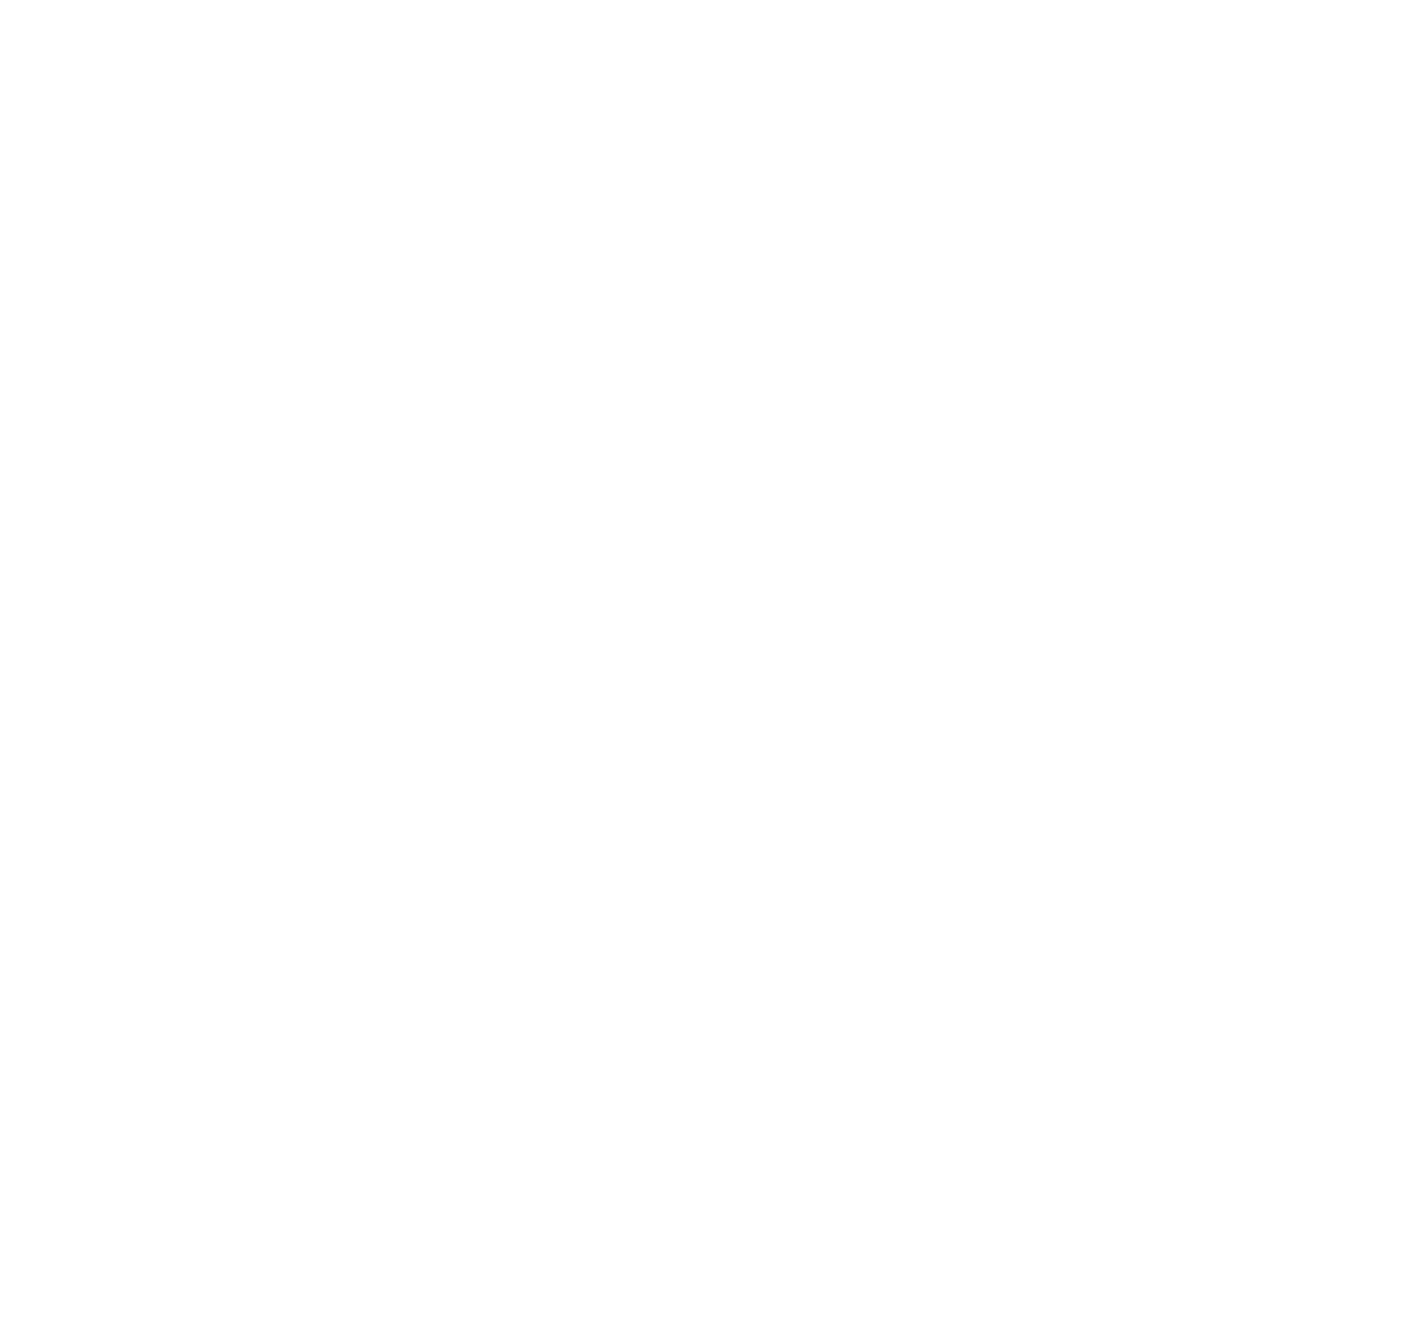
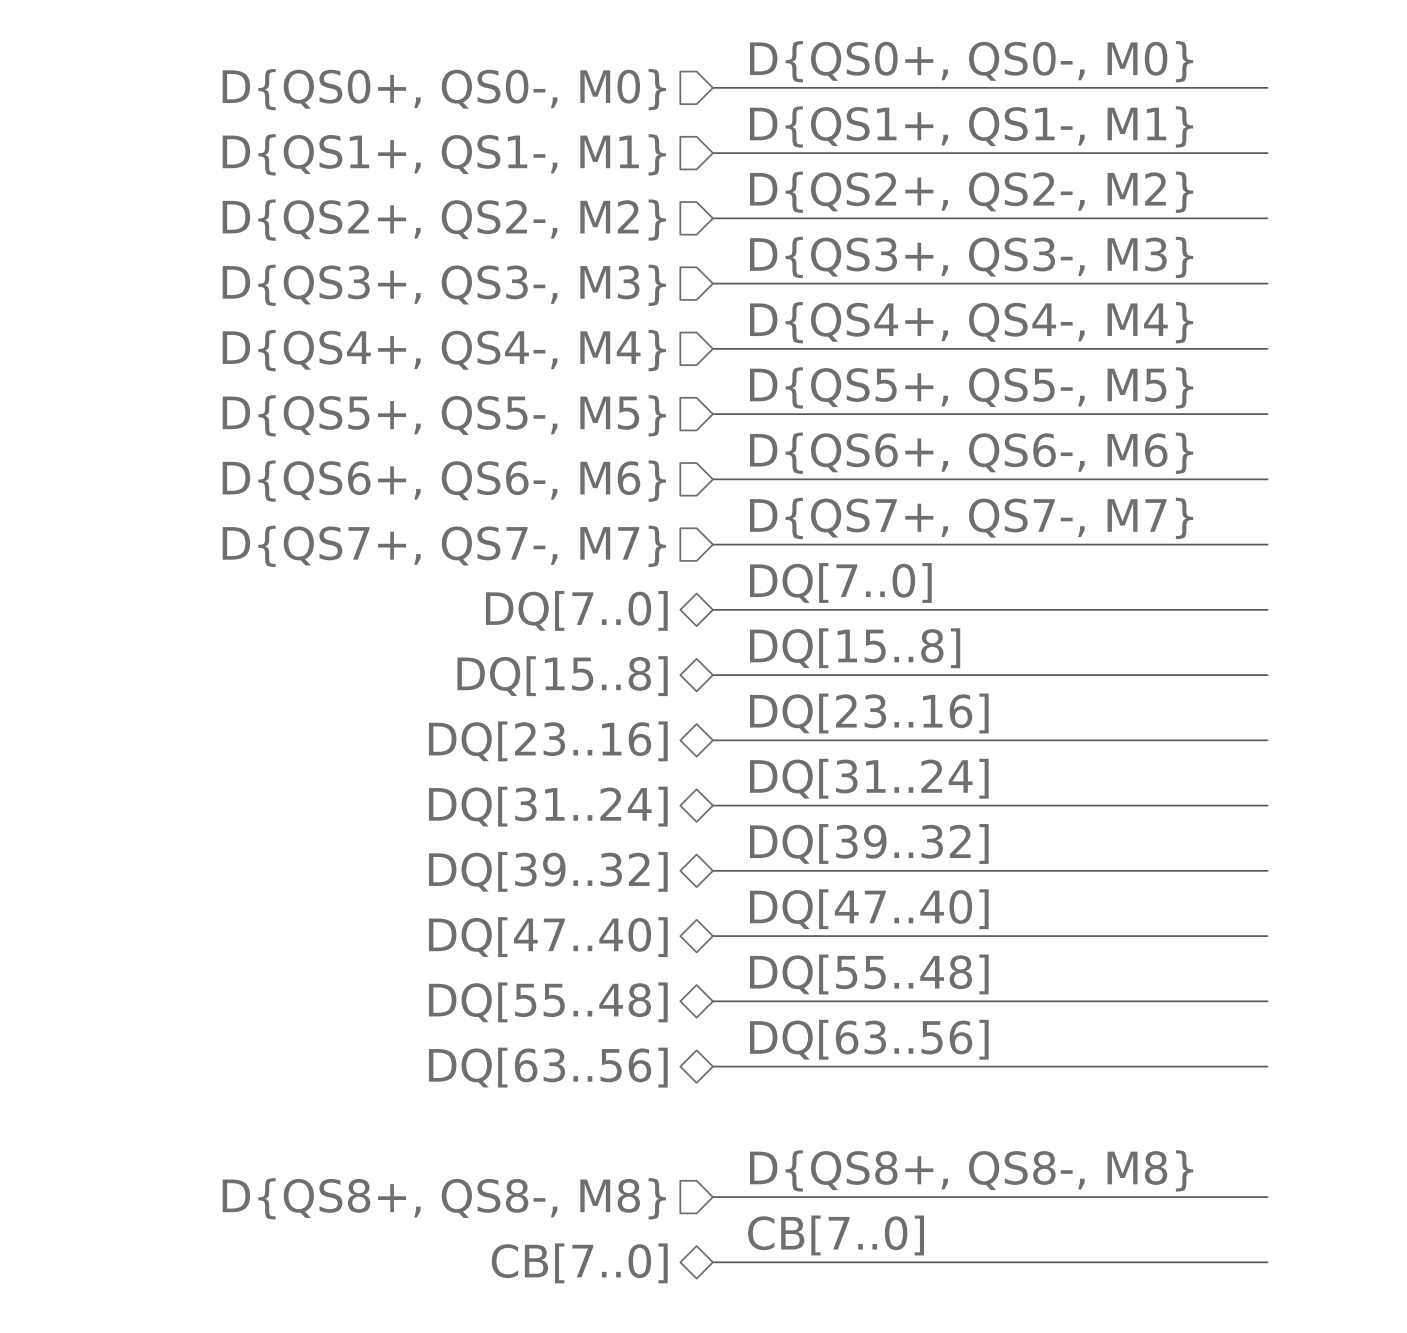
label: none -> D{QS0+, QS0-, M0} (971, 61)
bus: none -> (712, 87) (1267, 87)
hierarchical label: none -> D{QS0+, QS0-, M0} (444, 89)
label: none -> D{QS1+, QS1-, M1} (971, 126)
bus: none -> (712, 153) (1267, 153)
hierarchical label: none -> D{QS1+, QS1-, M1} (444, 154)
label: none -> D{QS2+, QS2-, M2} (971, 192)
bus: none -> (712, 218) (1267, 218)
hierarchical label: none -> D{QS2+, QS2-, M2} (444, 220)
label: none -> D{QS3+, QS3-, M3} (971, 257)
bus: none -> (712, 283) (1267, 283)
hierarchical label: none -> D{QS3+, QS3-, M3} (444, 285)
label: none -> D{QS4+, QS4-, M4} (971, 322)
bus: none -> (712, 348) (1267, 348)
hierarchical label: none -> D{QS4+, QS4-, M4} (444, 350)
label: none -> D{QS5+, QS5-, M5} (971, 387)
bus: none -> (712, 414) (1267, 414)
hierarchical label: none -> D{QS5+, QS5-, M5} (444, 415)
label: none -> D{QS6+, QS6-, M6} (971, 453)
bus: none -> (712, 479) (1267, 479)
hierarchical label: none -> D{QS6+, QS6-, M6} (444, 481)
label: none -> D{QS7+, QS7-, M7} (971, 518)
bus: none -> (712, 544) (1267, 544)
hierarchical label: none -> D{QS7+, QS7-, M7} (444, 546)
label: none -> DQ[7..0] (840, 582)
bus: none -> (712, 609) (1267, 609)
hierarchical label: none -> DQ[7..0] (576, 610)
label: none -> DQ[15..8] (855, 648)
bus: none -> (712, 675) (1267, 675)
hierarchical label: none -> DQ[15..8] (562, 676)
label: none -> DQ[23..16] (869, 713)
bus: none -> (712, 740) (1267, 740)
hierarchical label: none -> DQ[23..16] (548, 741)
label: none -> DQ[31..24] (869, 778)
bus: none -> (712, 805) (1267, 805)
hierarchical label: none -> DQ[31..24] (548, 806)
label: none -> DQ[39..32] (869, 843)
bus: none -> (712, 870) (1267, 870)
hierarchical label: none -> DQ[39..32] (548, 871)
label: none -> DQ[47..40] (869, 909)
bus: none -> (712, 936) (1267, 936)
hierarchical label: none -> DQ[47..40] (548, 937)
label: none -> DQ[55..48] (869, 974)
bus: none -> (712, 1001) (1267, 1001)
hierarchical label: none -> DQ[55..48] (548, 1002)
label: none -> DQ[63..56] (869, 1039)
bus: none -> (712, 1066) (1267, 1066)
hierarchical label: none -> DQ[63..56] (548, 1067)
label: none -> D{QS8+, QS8-, M8} (971, 1170)
bus: none -> (712, 1197) (1267, 1197)
hierarchical label: none -> D{QS8+, QS8-, M8} (444, 1198)
label: none -> CB[7..0] (836, 1235)
bus: none -> (712, 1262) (1267, 1262)
hierarchical label: none -> CB[7..0] (579, 1263)

